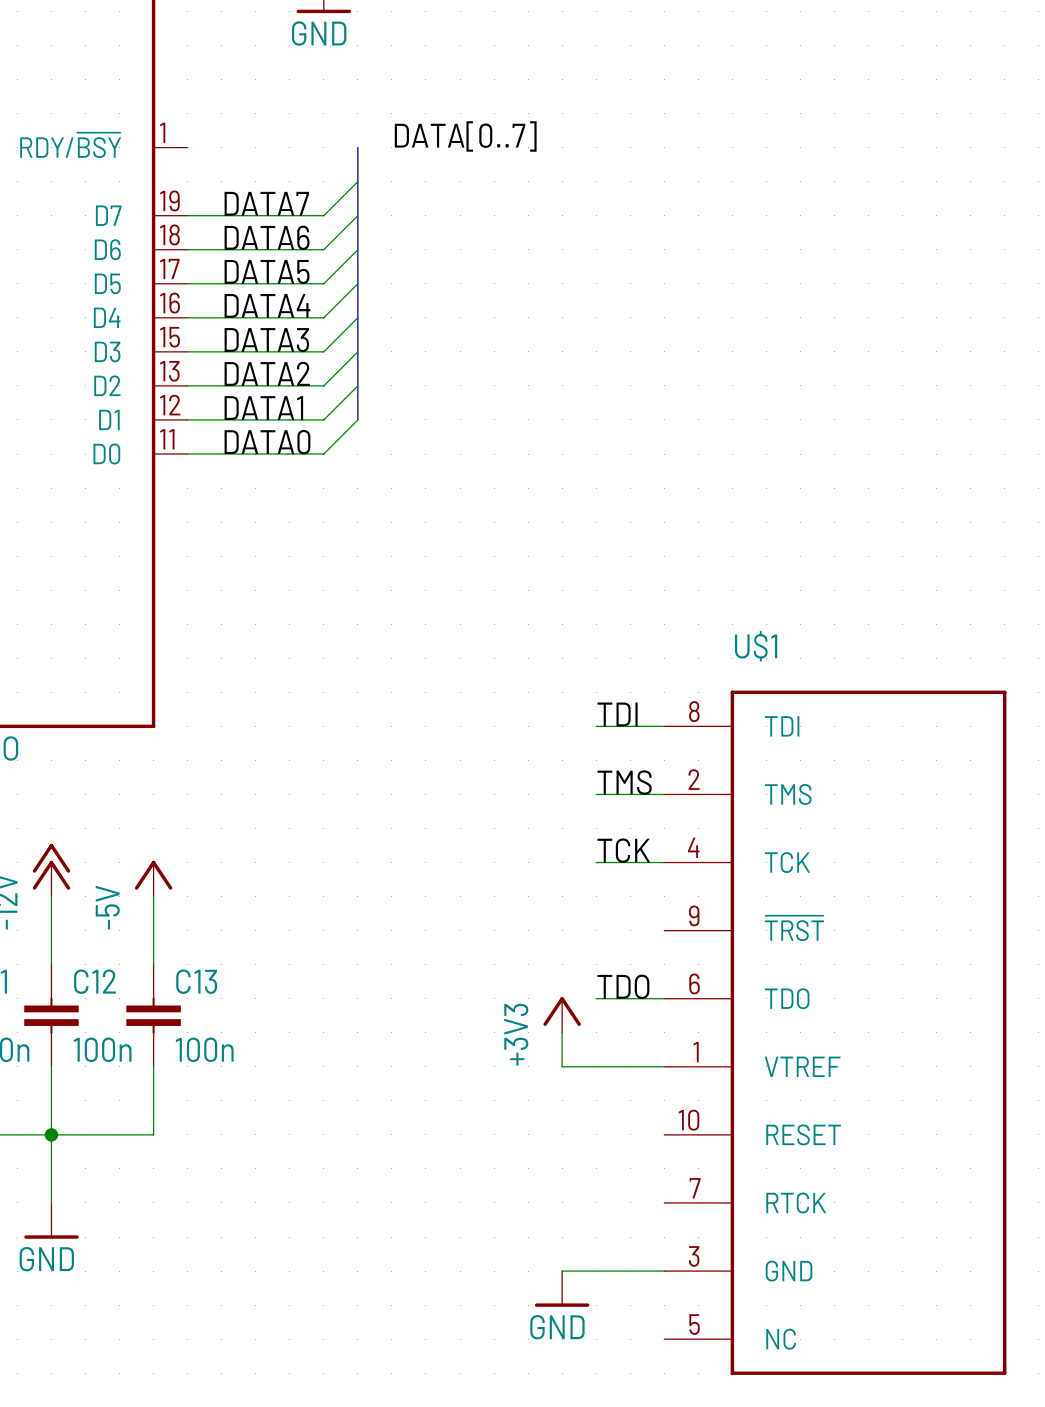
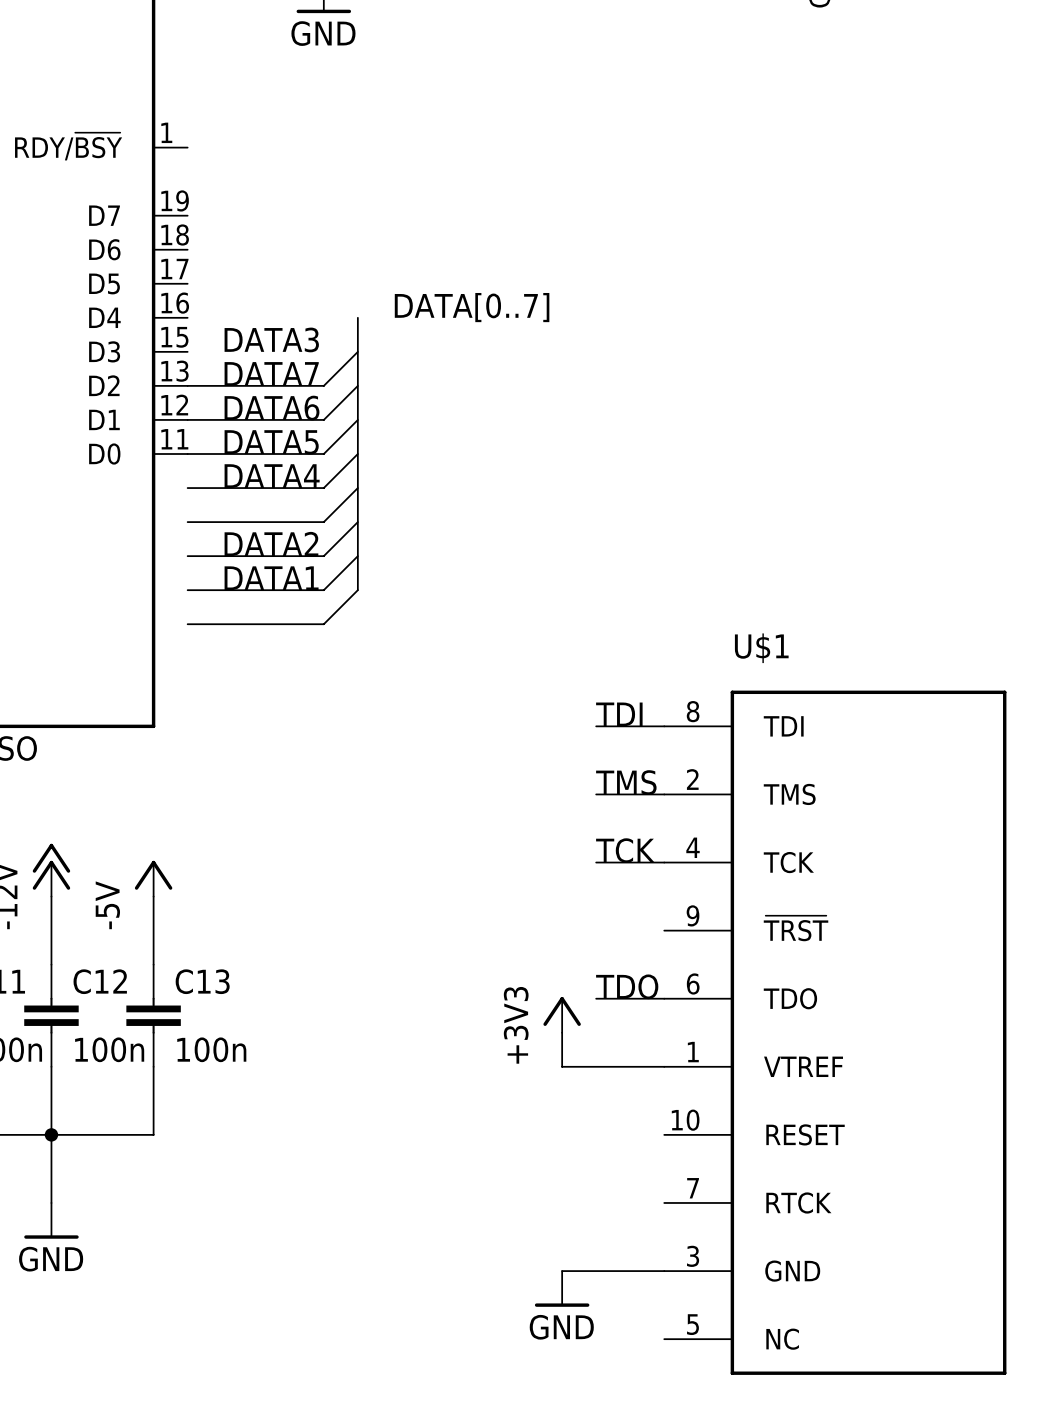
label position: DATA[0..7] (465, 136) -> DATA[0..7] (472, 307)
bus: (357, 147) (357, 317) -> (357, 419) (357, 590)
wire: (357, 181) (323, 215) (187, 215) -> (357, 454) (323, 488) (187, 488)
label: DATA7 (266, 203) -> none
wire: (357, 215) (323, 249) (187, 249) -> (357, 488) (323, 522) (187, 522)
label: DATA6 (267, 237) -> none
wire: (357, 249) (323, 283) (187, 283) -> (357, 522) (323, 556) (187, 556)
label: DATA5 (267, 271) -> none
wire: (357, 283) (323, 317) (187, 317) -> (357, 556) (323, 590) (187, 590)
label position: DATA4 (267, 305) -> DATA4 (272, 476)
wire: (357, 317) (323, 351) (187, 351) -> (357, 590) (323, 624) (187, 624)
label: DATA2 (267, 373) -> DATA7 (271, 373)
label: DATA1 (263, 408) -> DATA6 (272, 408)
label: DATA0 (267, 442) -> DATA5 (271, 442)
label: none -> DATA2 (271, 544)
label: none -> DATA1 (271, 578)

